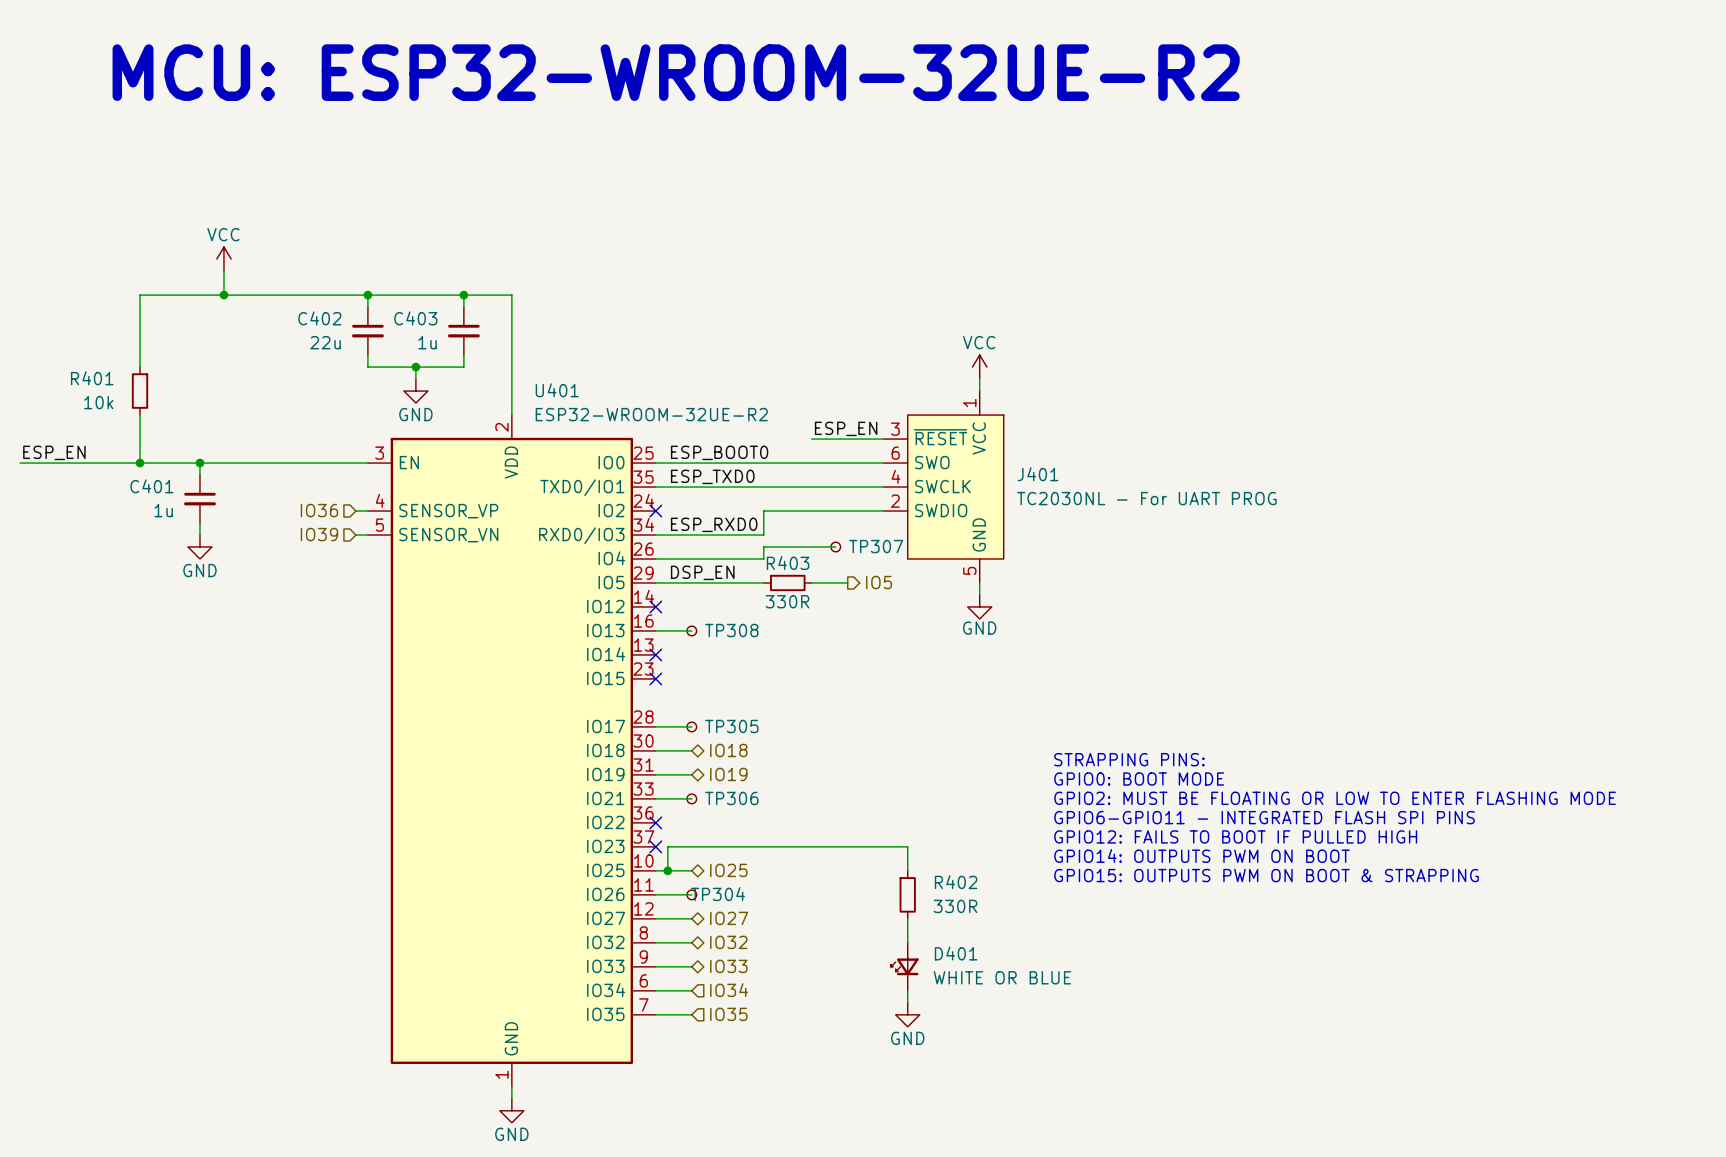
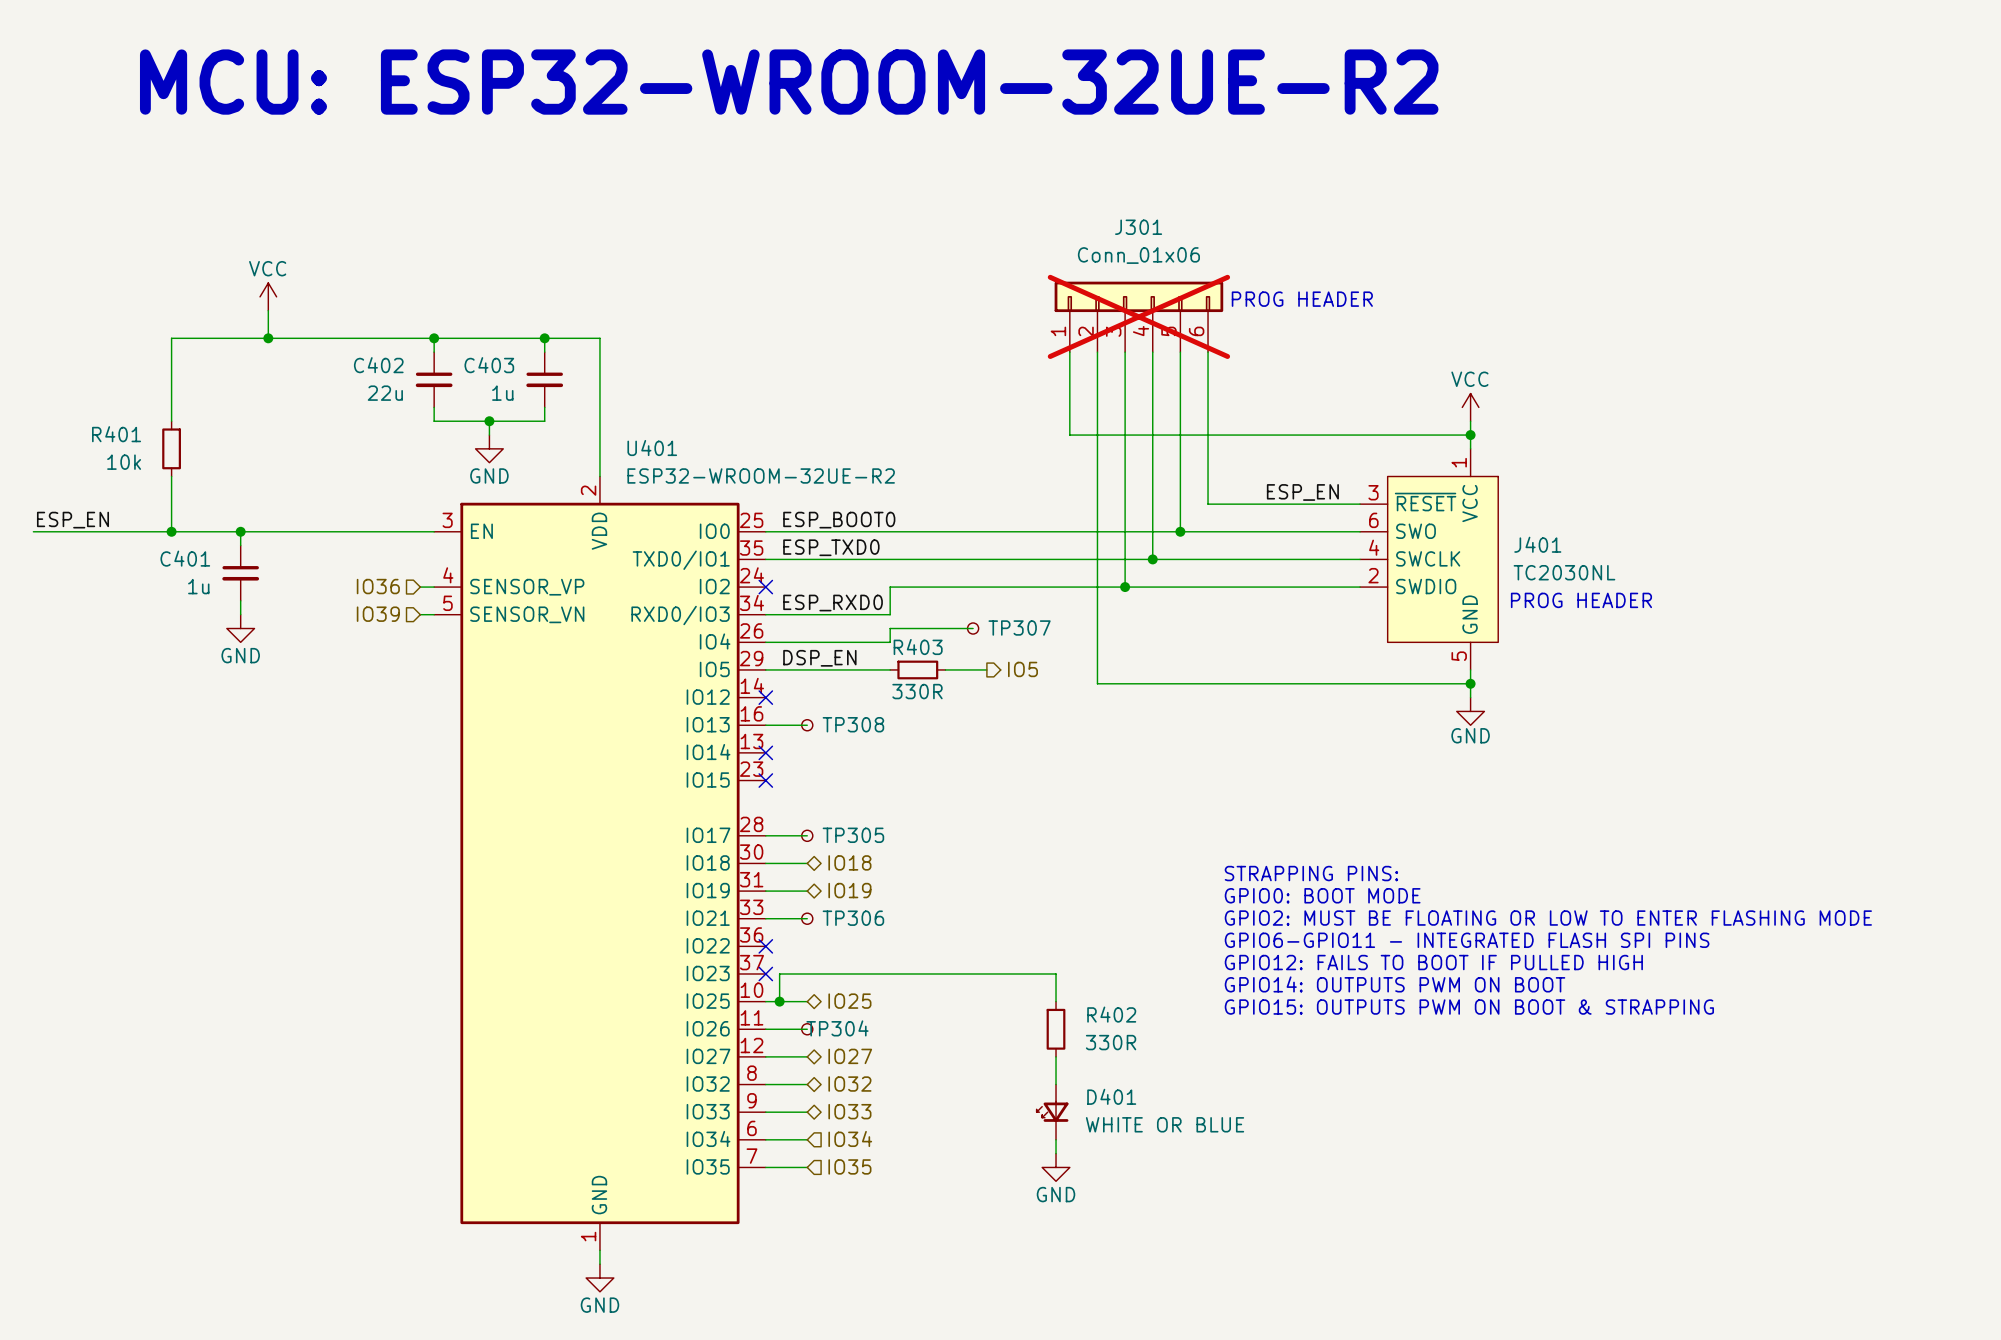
text: none -> PROG HEADER (1302, 299)
J301: none -> Conn_01x06 (1138, 316)
wire: none -> (1069, 352) (1069, 435) (1470, 435)
wire: none -> (1097, 352) (1097, 683) (1470, 683)
wire: none -> (1125, 352) (1125, 587)
wire: none -> (1152, 352) (1152, 559)
wire: none -> (1180, 352) (1180, 531)
wire: none -> (1208, 352) (1208, 504) (1360, 504)
power symbol: none -> VCC (1470, 407)
power symbol: VCC (979, 367) -> none
wire: none -> (1470, 421) (1470, 448)
wire: (979, 379) (979, 391) -> none
junction: none -> (1470, 435)
label: ESP_EN (846, 428) -> none
label: none -> ESP_EN (1302, 492)
wire: (811, 439) (883, 439) -> none
wire: none -> (1028, 531) (1360, 531)
junction: none -> (1180, 531)
wire: none -> (1028, 559) (1360, 559)
J401 position: (943, 487) -> (1429, 559)
junction: none -> (1152, 559)
J401 value: TC2030NL - For UART PROG (1146, 498) -> TC2030NL (1564, 572)
wire: none -> (1028, 587) (1360, 587)
junction: none -> (1125, 587)
text: none -> PROG HEADER (1581, 600)
wire: (979, 582) (979, 594) -> none
wire: none -> (1470, 669) (1470, 697)
junction: none -> (1470, 683)
power symbol: GND (979, 606) -> none
power symbol: none -> GND (1470, 711)

